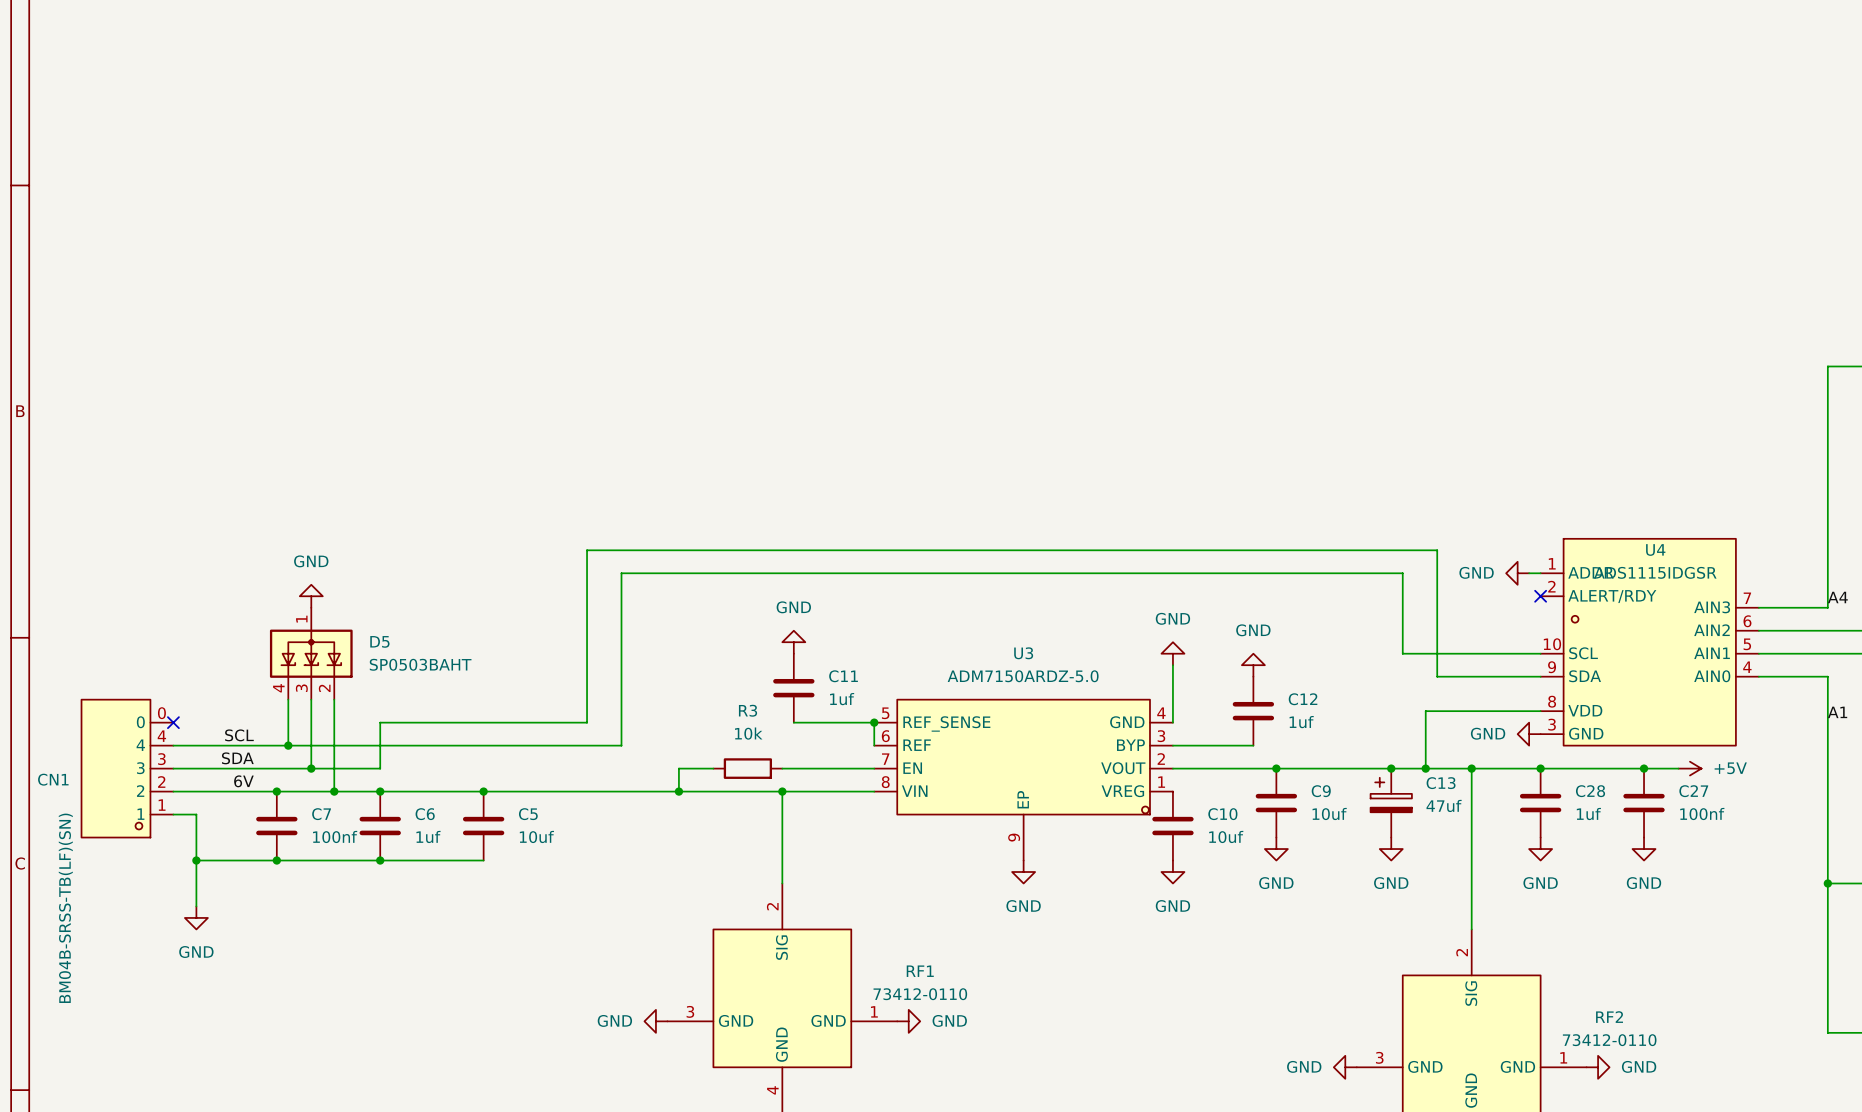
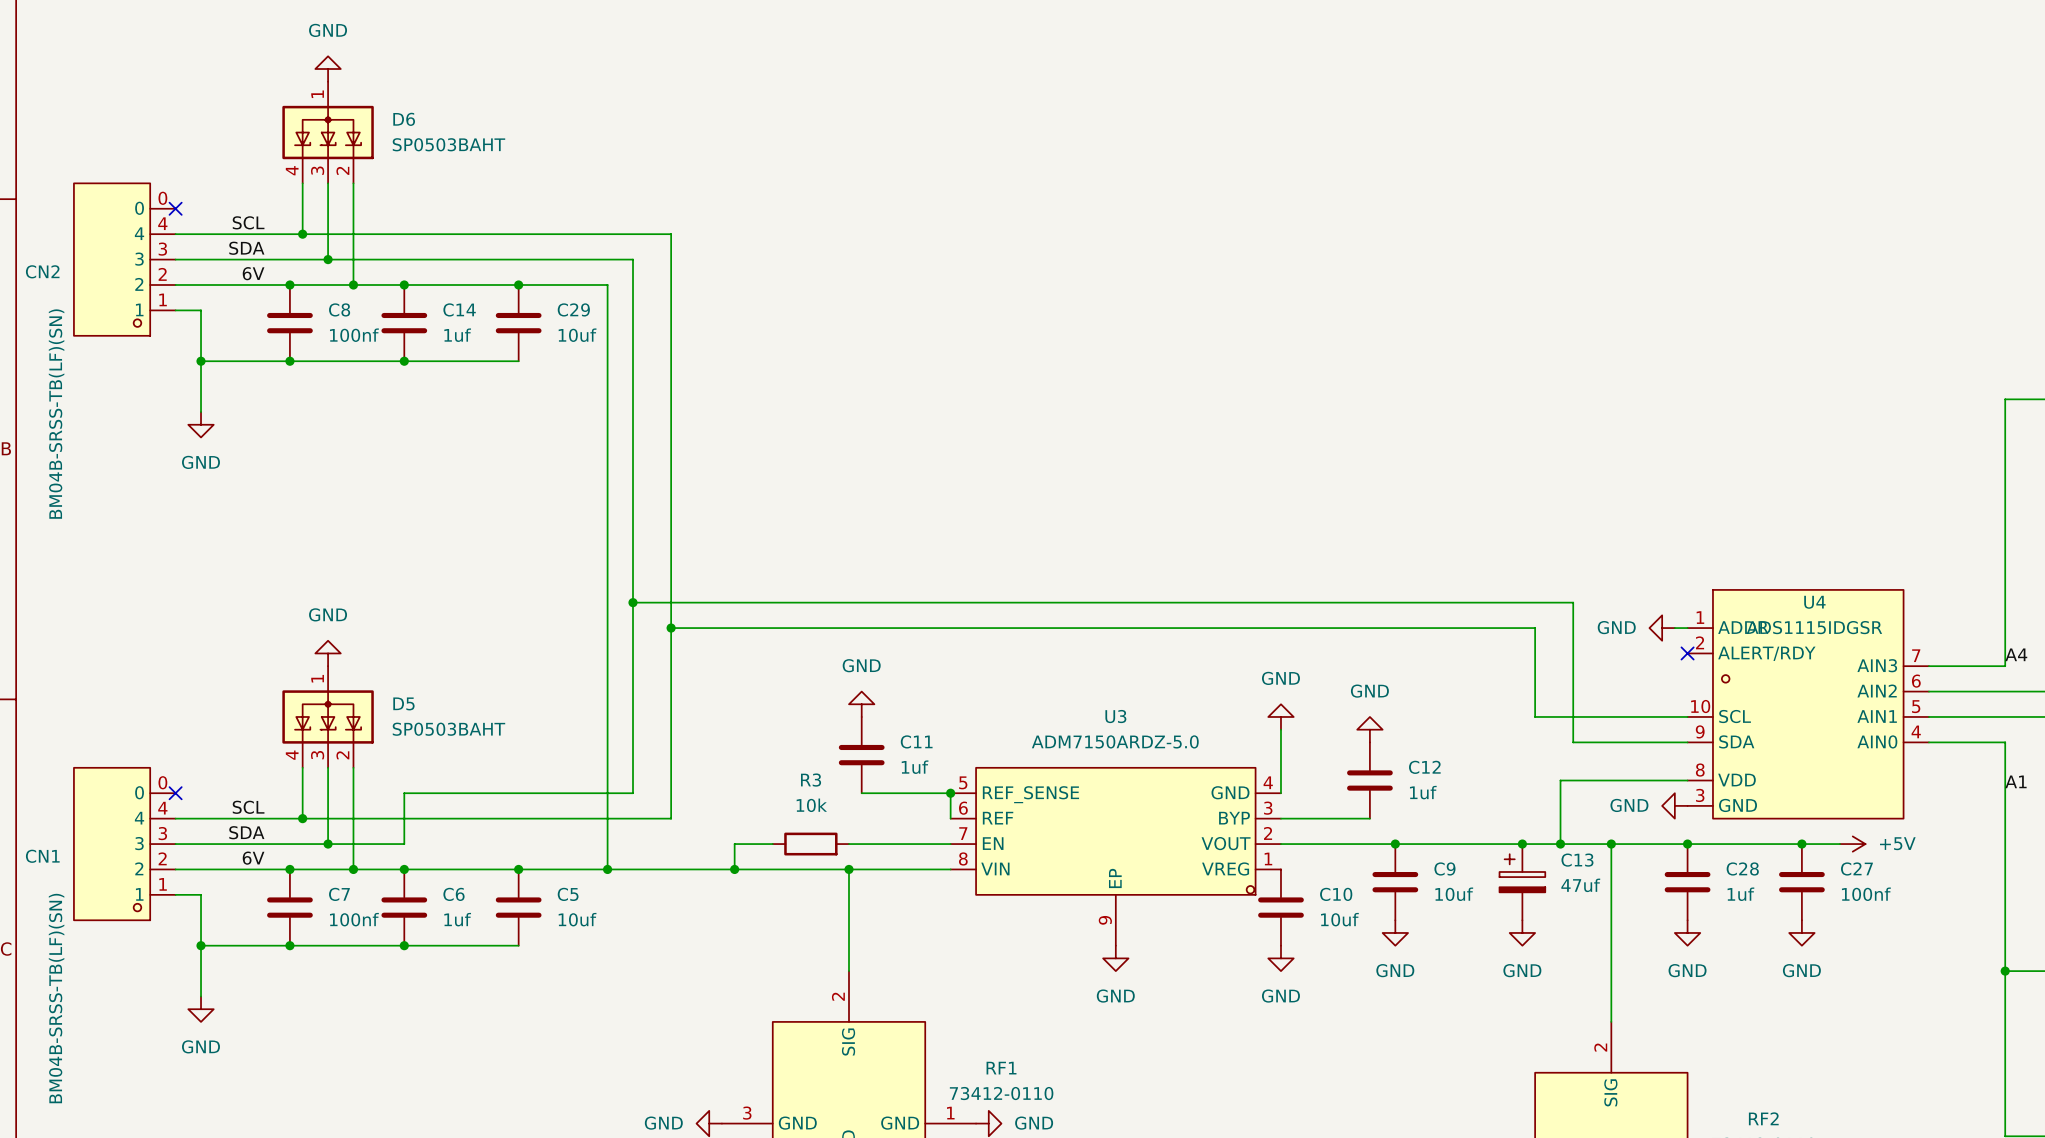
power symbol: none -> GND (328, 69)
D6: none -> SP0503BAHT (328, 132)
wire: none -> (302, 183) (302, 234)
wire: none -> (328, 183) (328, 259)
wire: none -> (353, 183) (353, 284)
no-connect mark: none -> (175, 208)
label: none -> SCL (248, 222)
wire: none -> (175, 234) (671, 234) (671, 628)
junction: none -> (302, 234)
label: none -> SDA (246, 248)
CN2: none -> BM04B-SRSS-TB(LF)(SN) (124, 259)
wire: none -> (175, 259) (633, 259) (633, 602)
junction: none -> (328, 259)
label: none -> 6V (253, 273)
wire: none -> (175, 284) (607, 284) (607, 869)
junction: none -> (289, 284)
junction: none -> (353, 284)
junction: none -> (404, 284)
junction: none -> (518, 284)
wire: none -> (175, 310) (201, 310) (201, 412)
C8: none -> 100nf (289, 323)
C14: none -> 1uf (404, 323)
C29: none -> 10uf (518, 323)
wire: none -> (201, 361) (518, 361)
junction: none -> (201, 361)
junction: none -> (289, 361)
junction: none -> (404, 361)
power symbol: none -> GND (201, 424)
junction: none -> (633, 602)
junction: none -> (671, 628)
junction: none -> (607, 869)

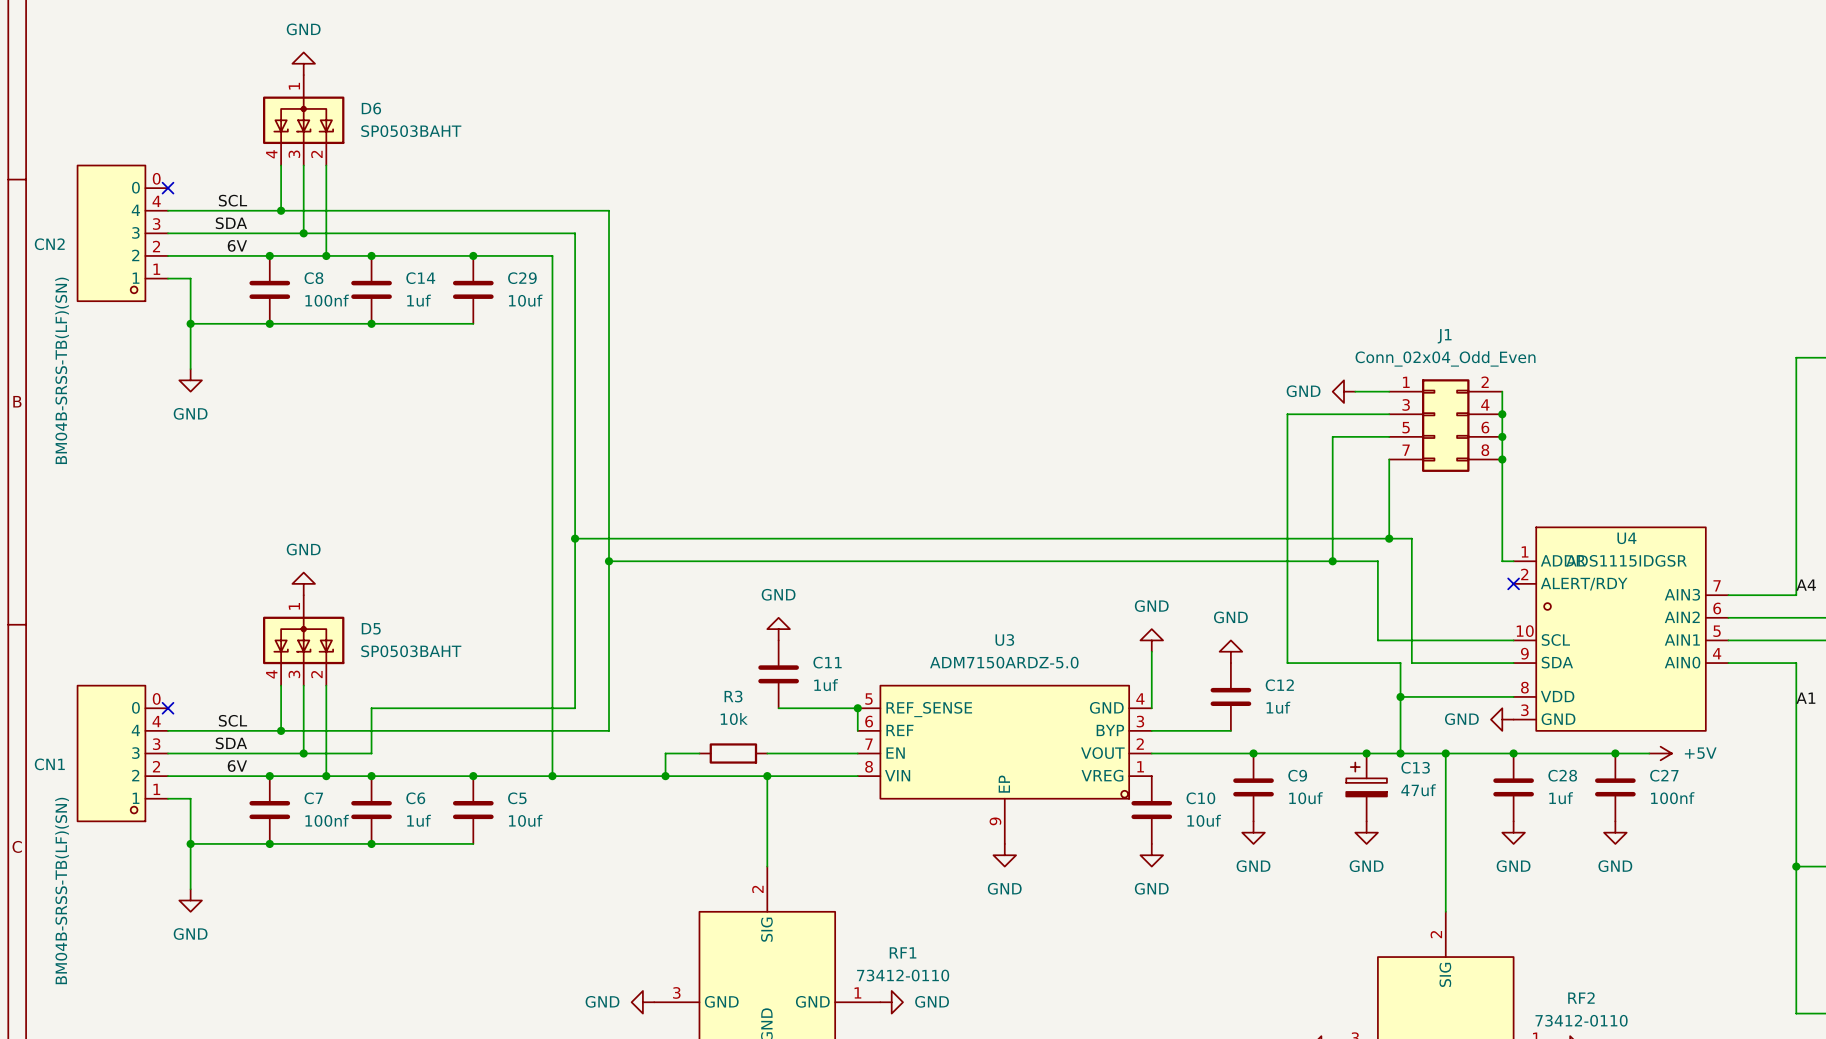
power symbol: none -> GND (1343, 391)
wire: none -> (1355, 391) (1389, 391)
wire: none -> (1502, 391) (1502, 561)
wire: none -> (1389, 414) (1287, 414) (1287, 663) (1400, 663) (1400, 696)
junction: none -> (1502, 414)
J1: none -> Conn_02x04_Odd_Even (1445, 425)
wire: none -> (1389, 436) (1332, 436) (1332, 561)
junction: none -> (1502, 436)
wire: none -> (1389, 459) (1389, 538)
junction: none -> (1502, 459)
junction: none -> (1389, 538)
junction: none -> (1332, 561)
power symbol: GND (1662, 628) -> none
junction: none -> (1400, 696)

